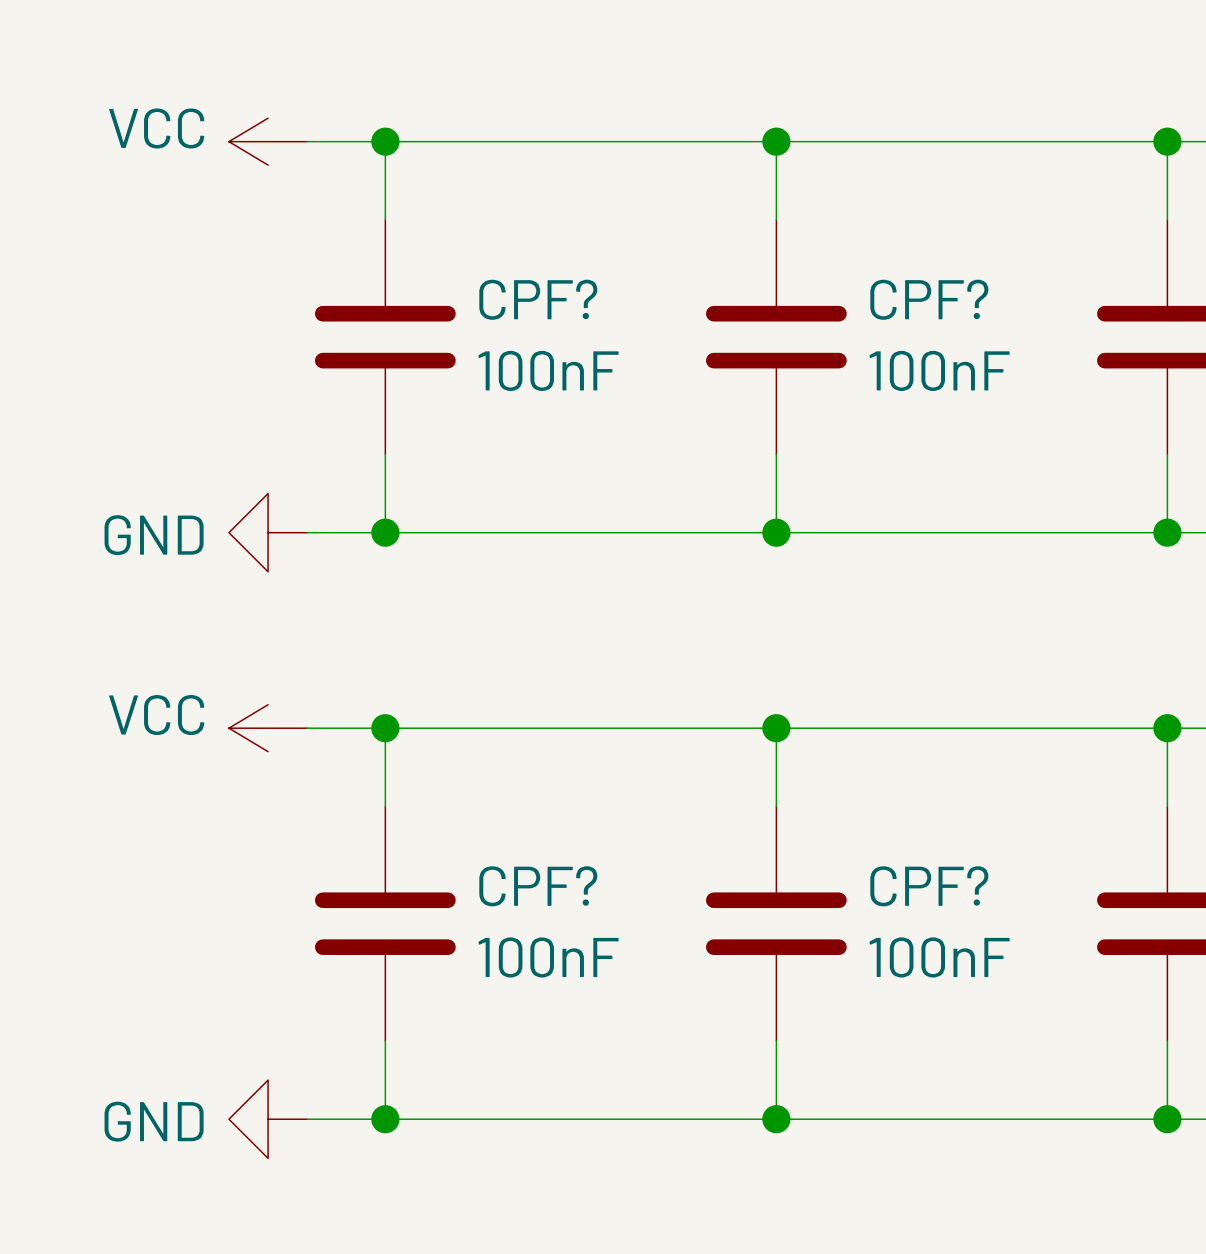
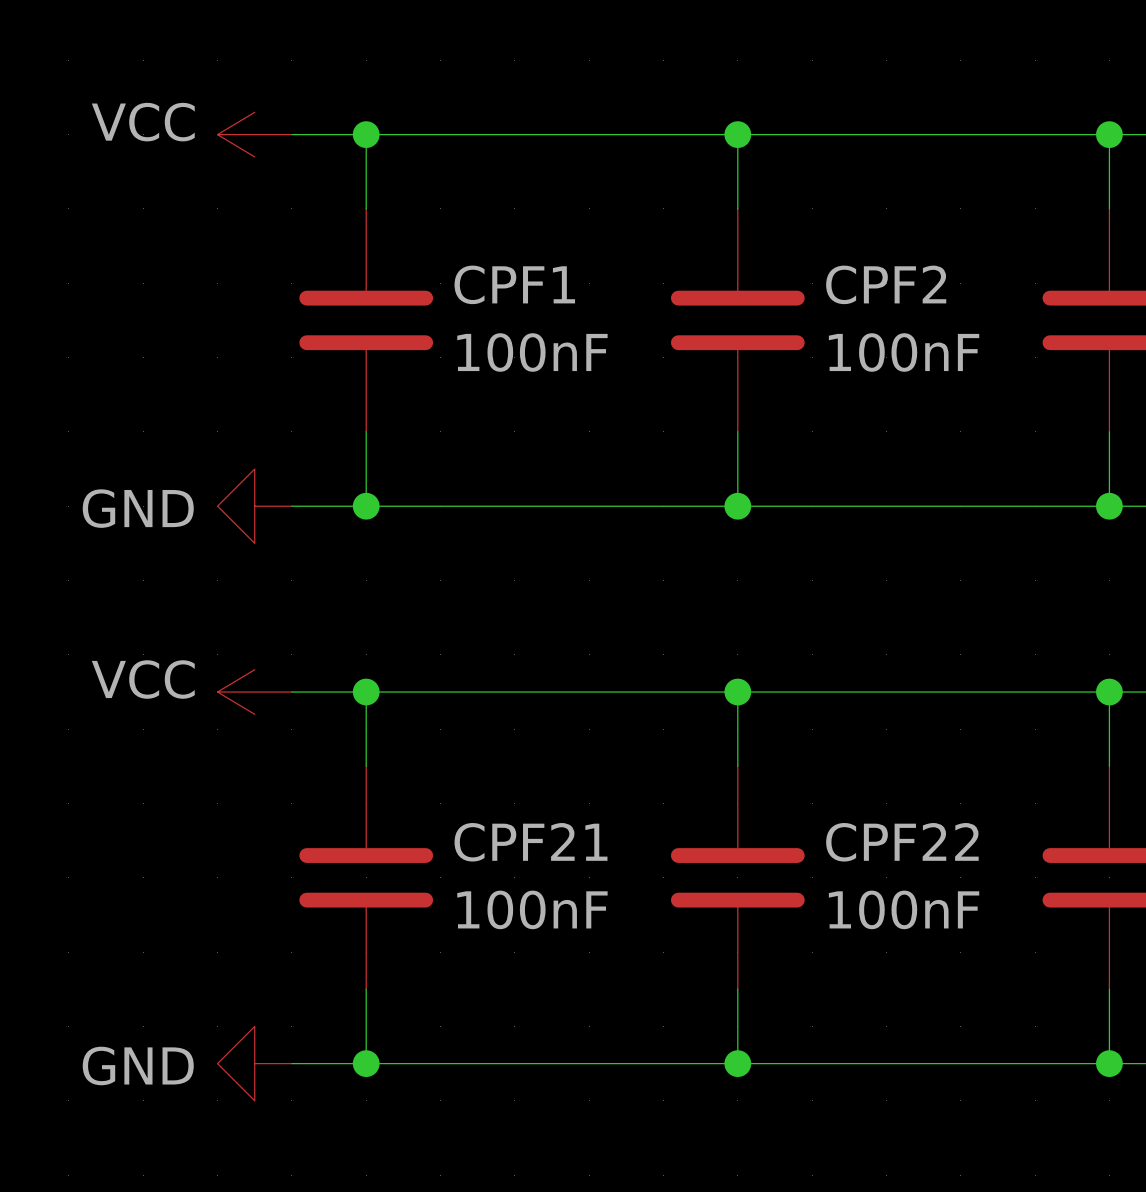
CPF? name: CPF? (538, 299) -> CPF1 (514, 284)
CPF? name: CPF? (929, 299) -> CPF2 (886, 284)
CPF? name: CPF? (538, 886) -> CPF21 (531, 842)
CPF? name: CPF? (929, 886) -> CPF22 (902, 842)

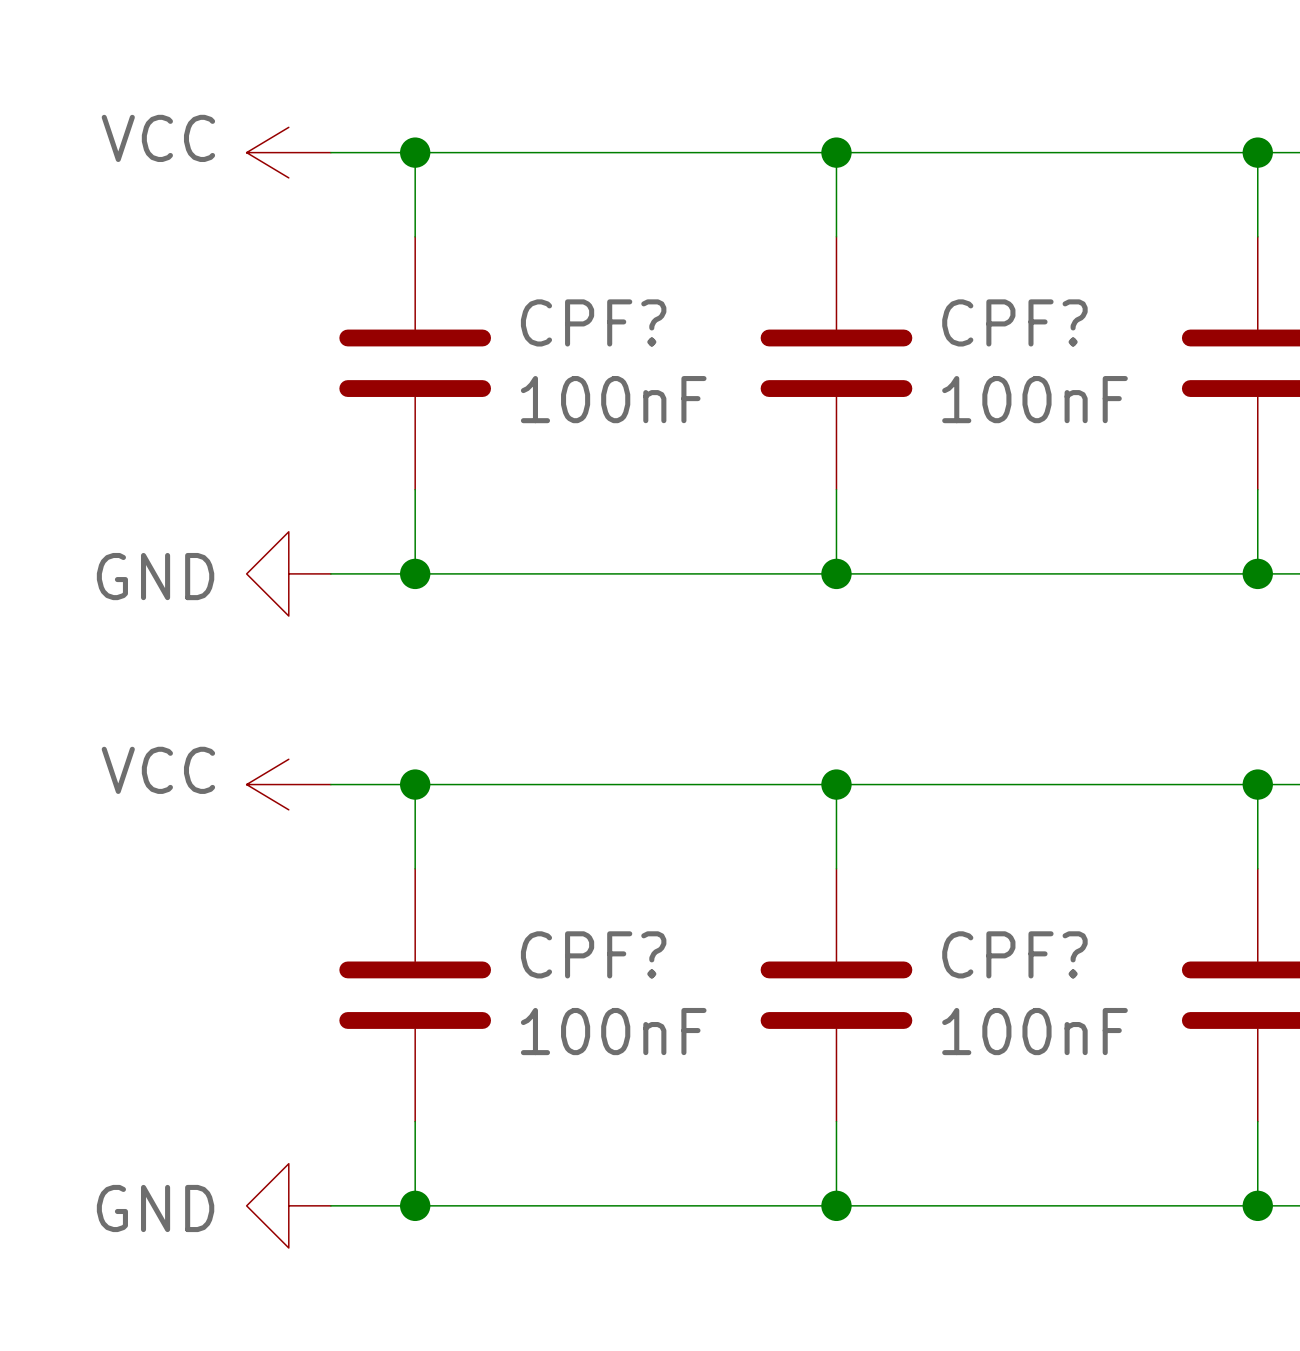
CPF1 name: CPF1 (514, 284) -> CPF? (593, 322)
CPF2 name: CPF2 (886, 284) -> CPF? (1014, 322)
CPF21 name: CPF21 (531, 842) -> CPF? (593, 954)
CPF22 name: CPF22 (902, 842) -> CPF? (1014, 954)

